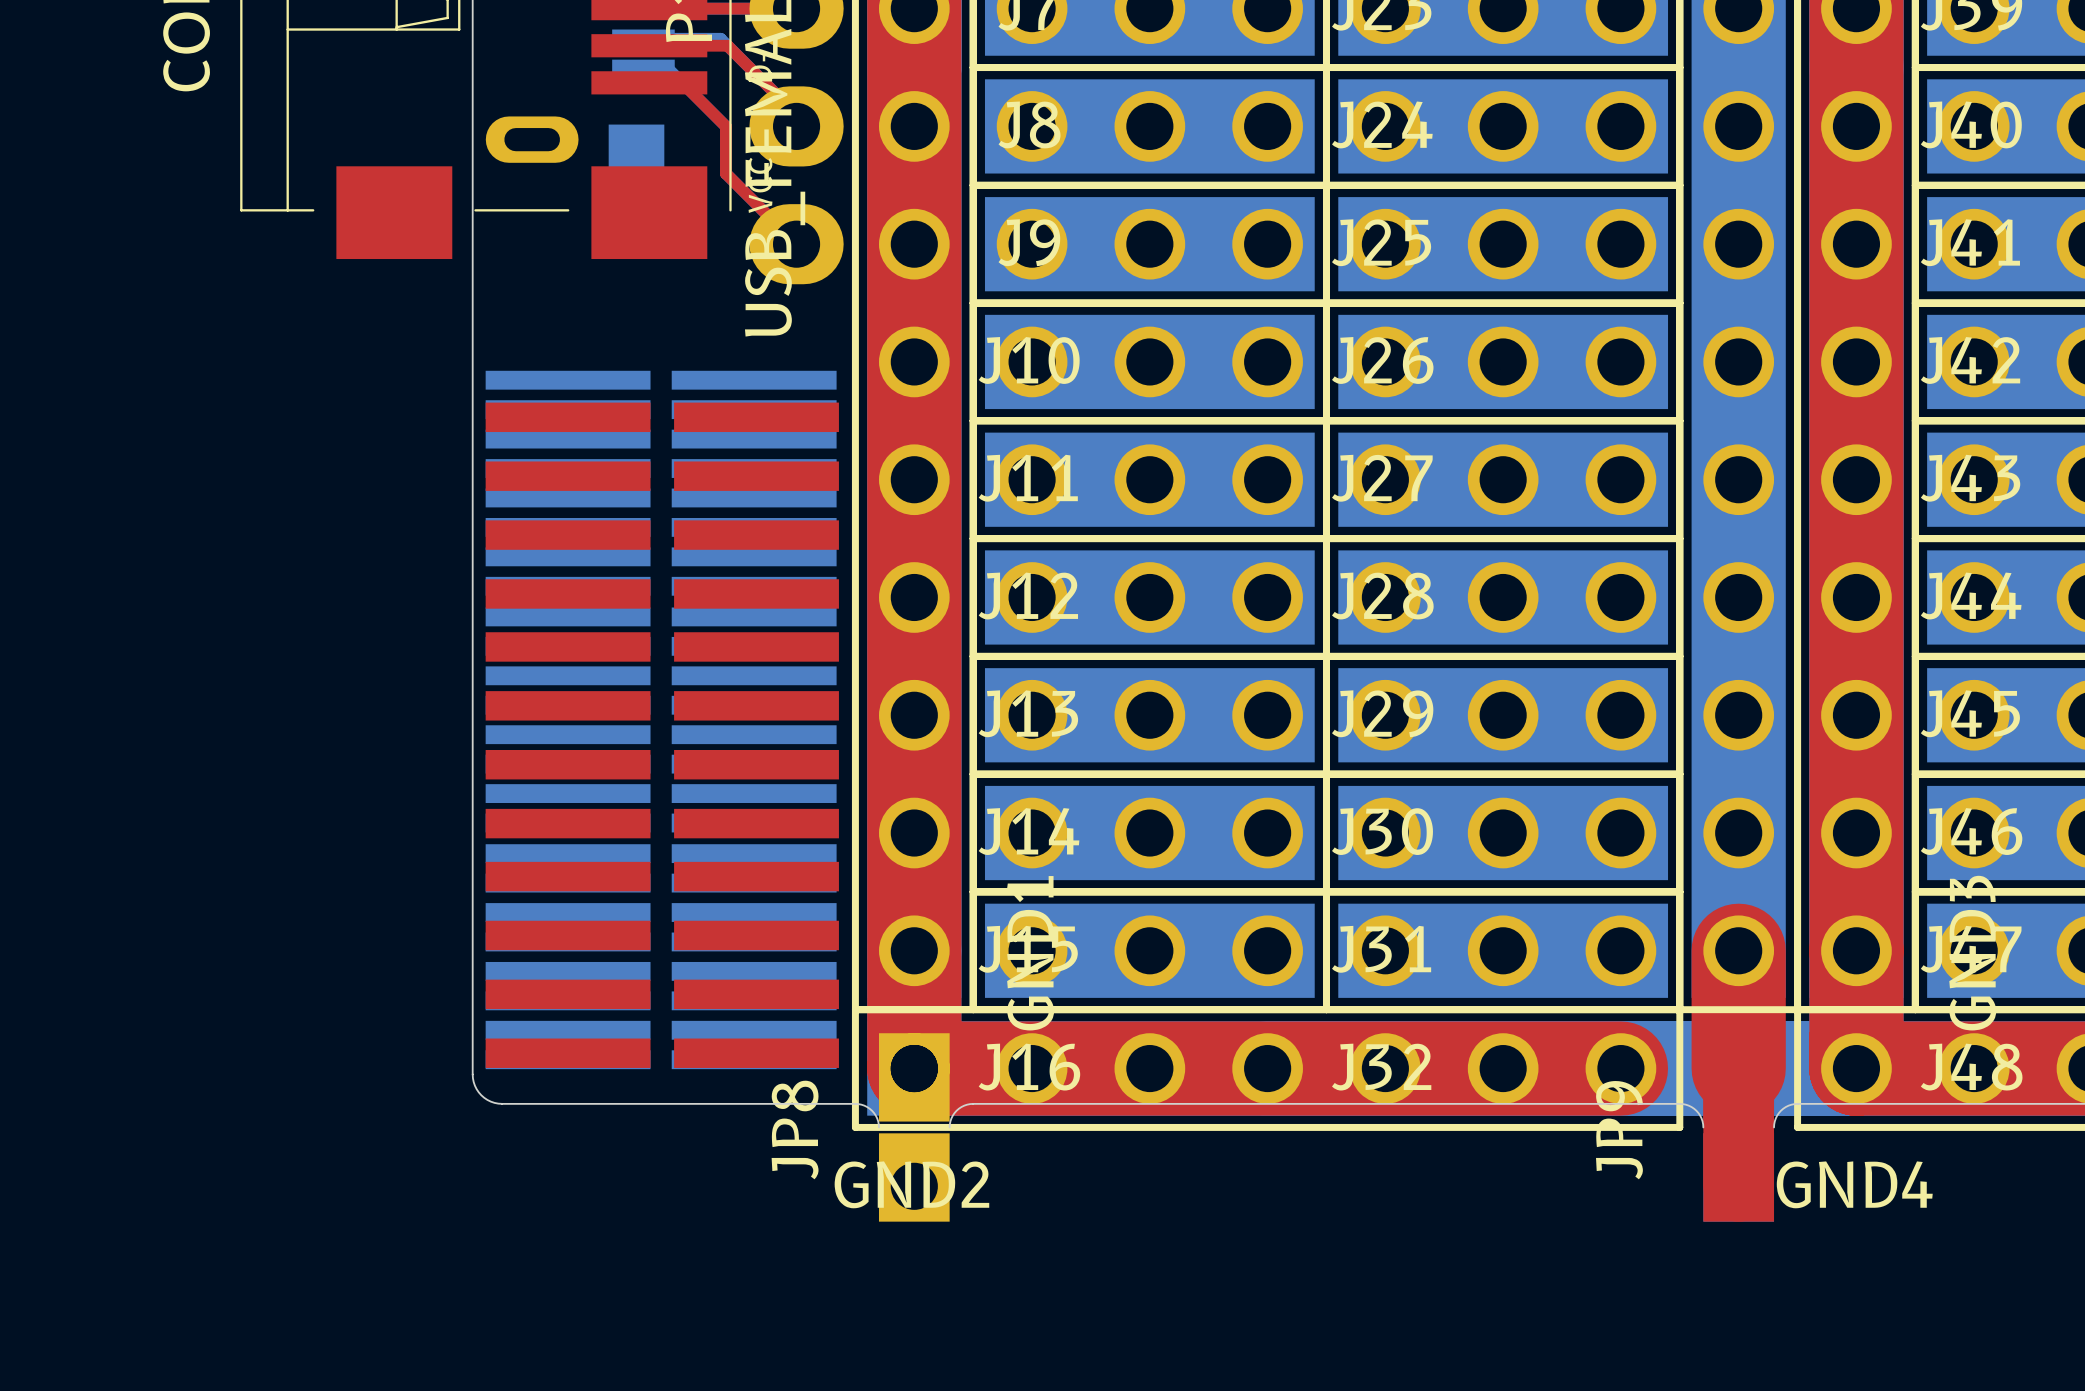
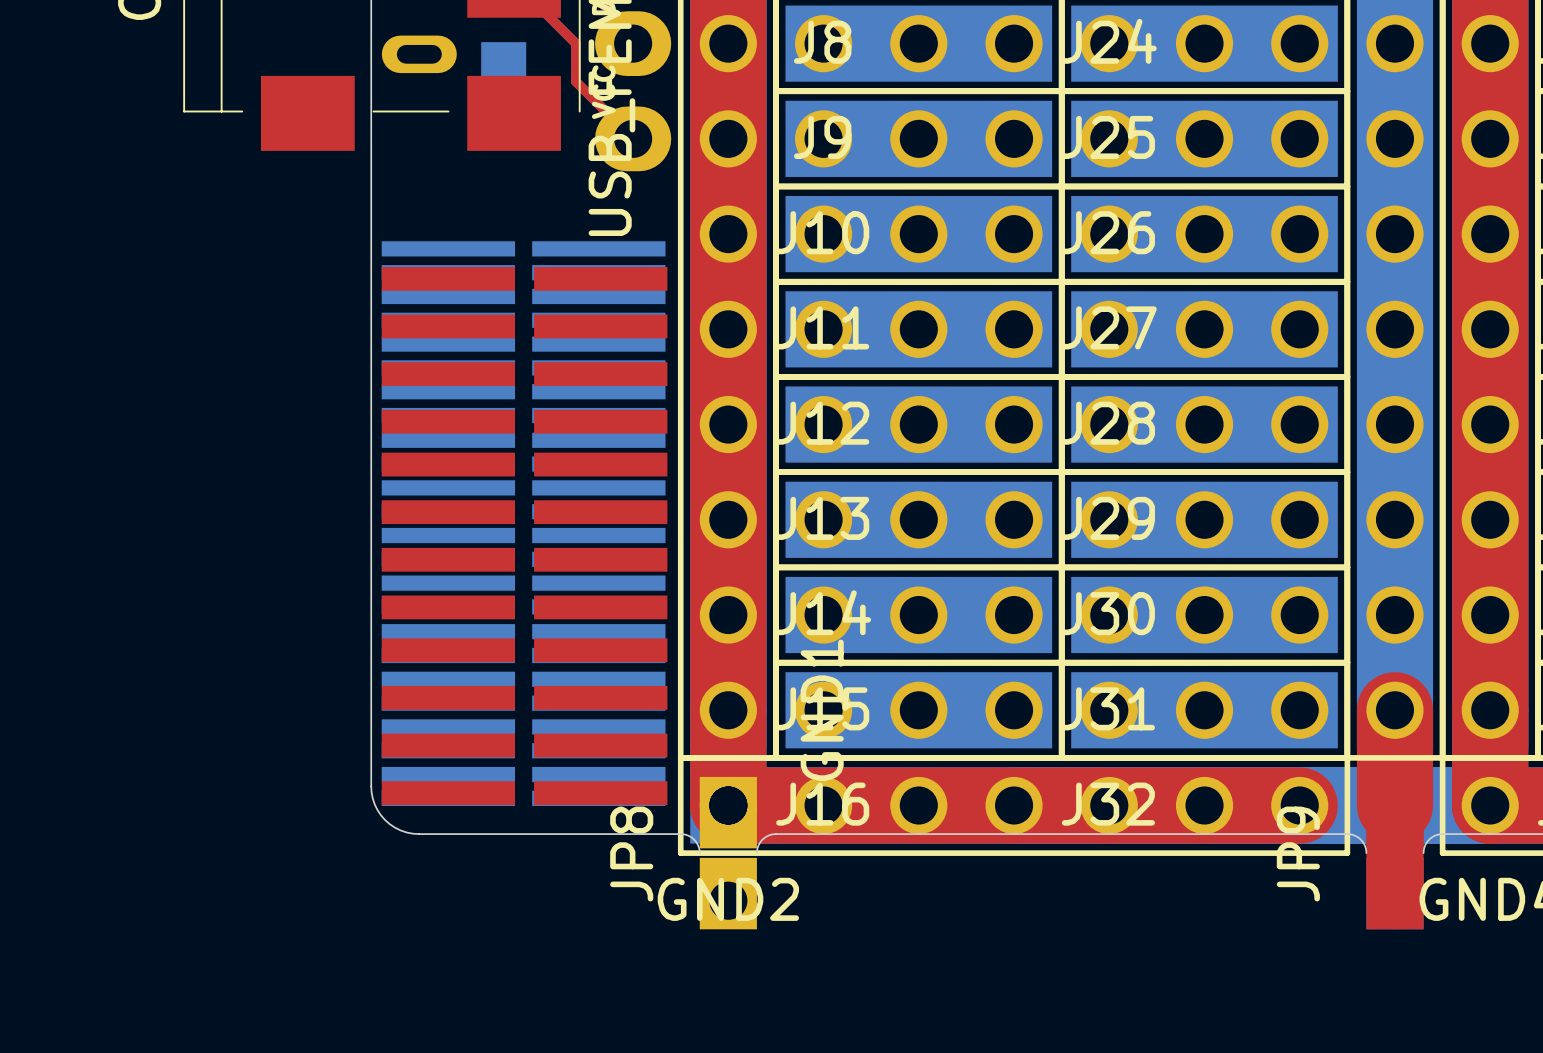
board edge: (472, 1045) (472, 1074) -> none
board edge: (472, 1074) (476, 1089) (487, 1099) (498, 1103) (531, 1103) -> (371, 786) (374, 804) (385, 820) (400, 830) (418, 834)

